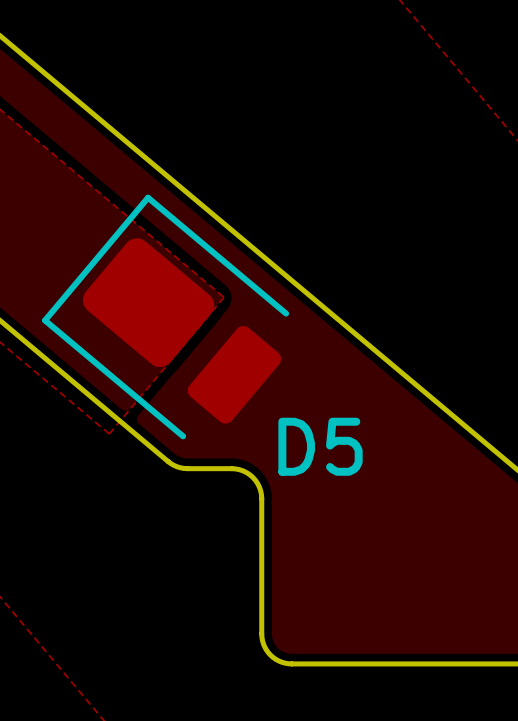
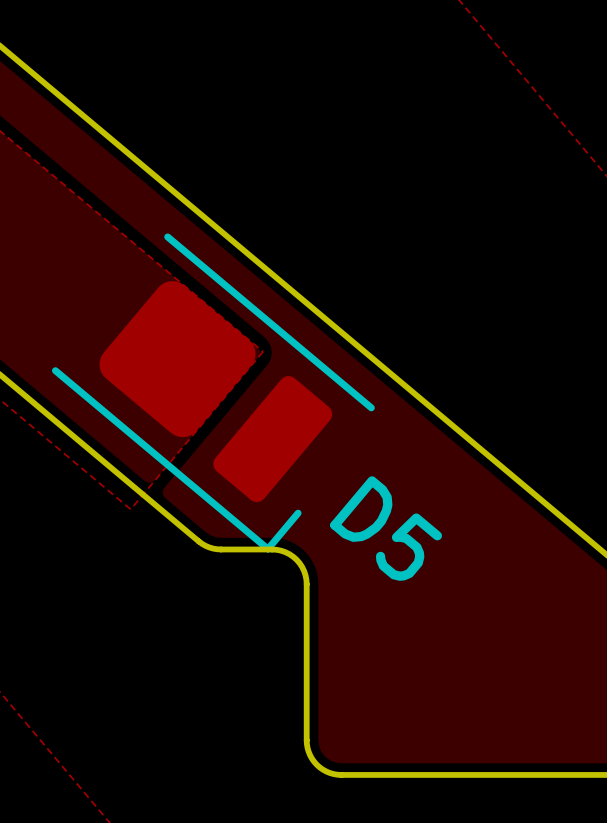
D5 footprint: [42, 194, 290, 440] -> [51, 233, 375, 553]

